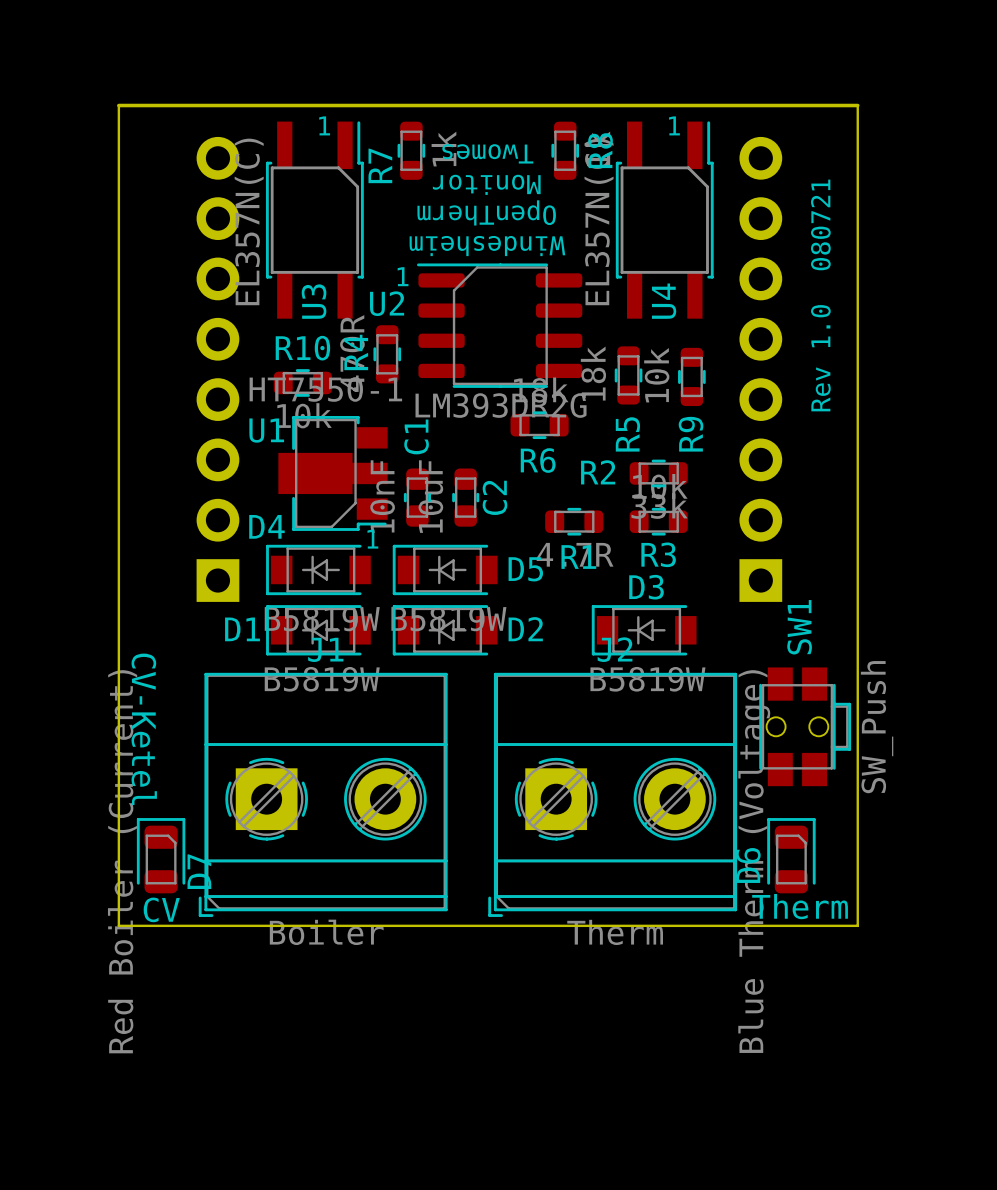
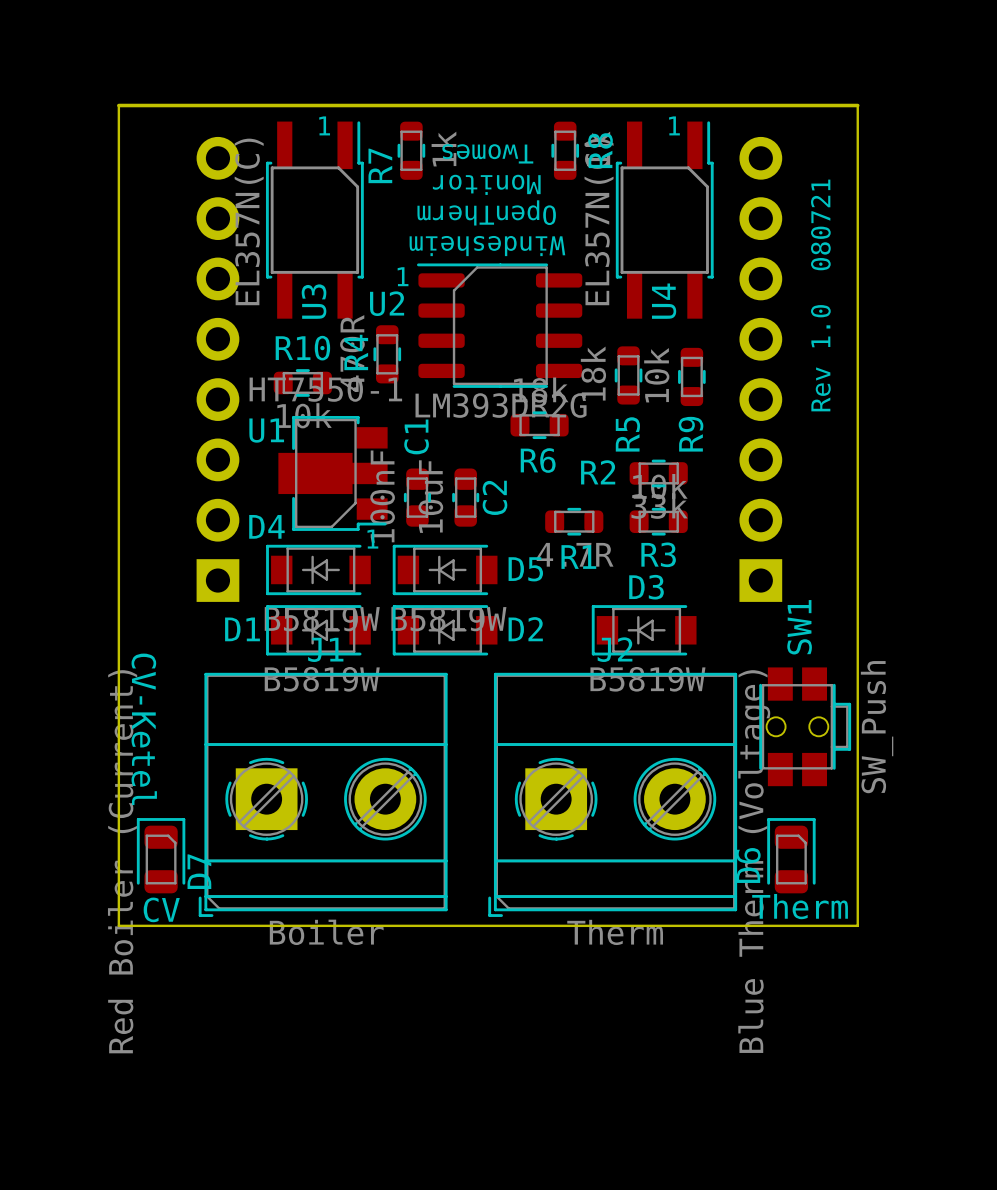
C1 value: 10nF (382, 496) -> 100nF (382, 496)

